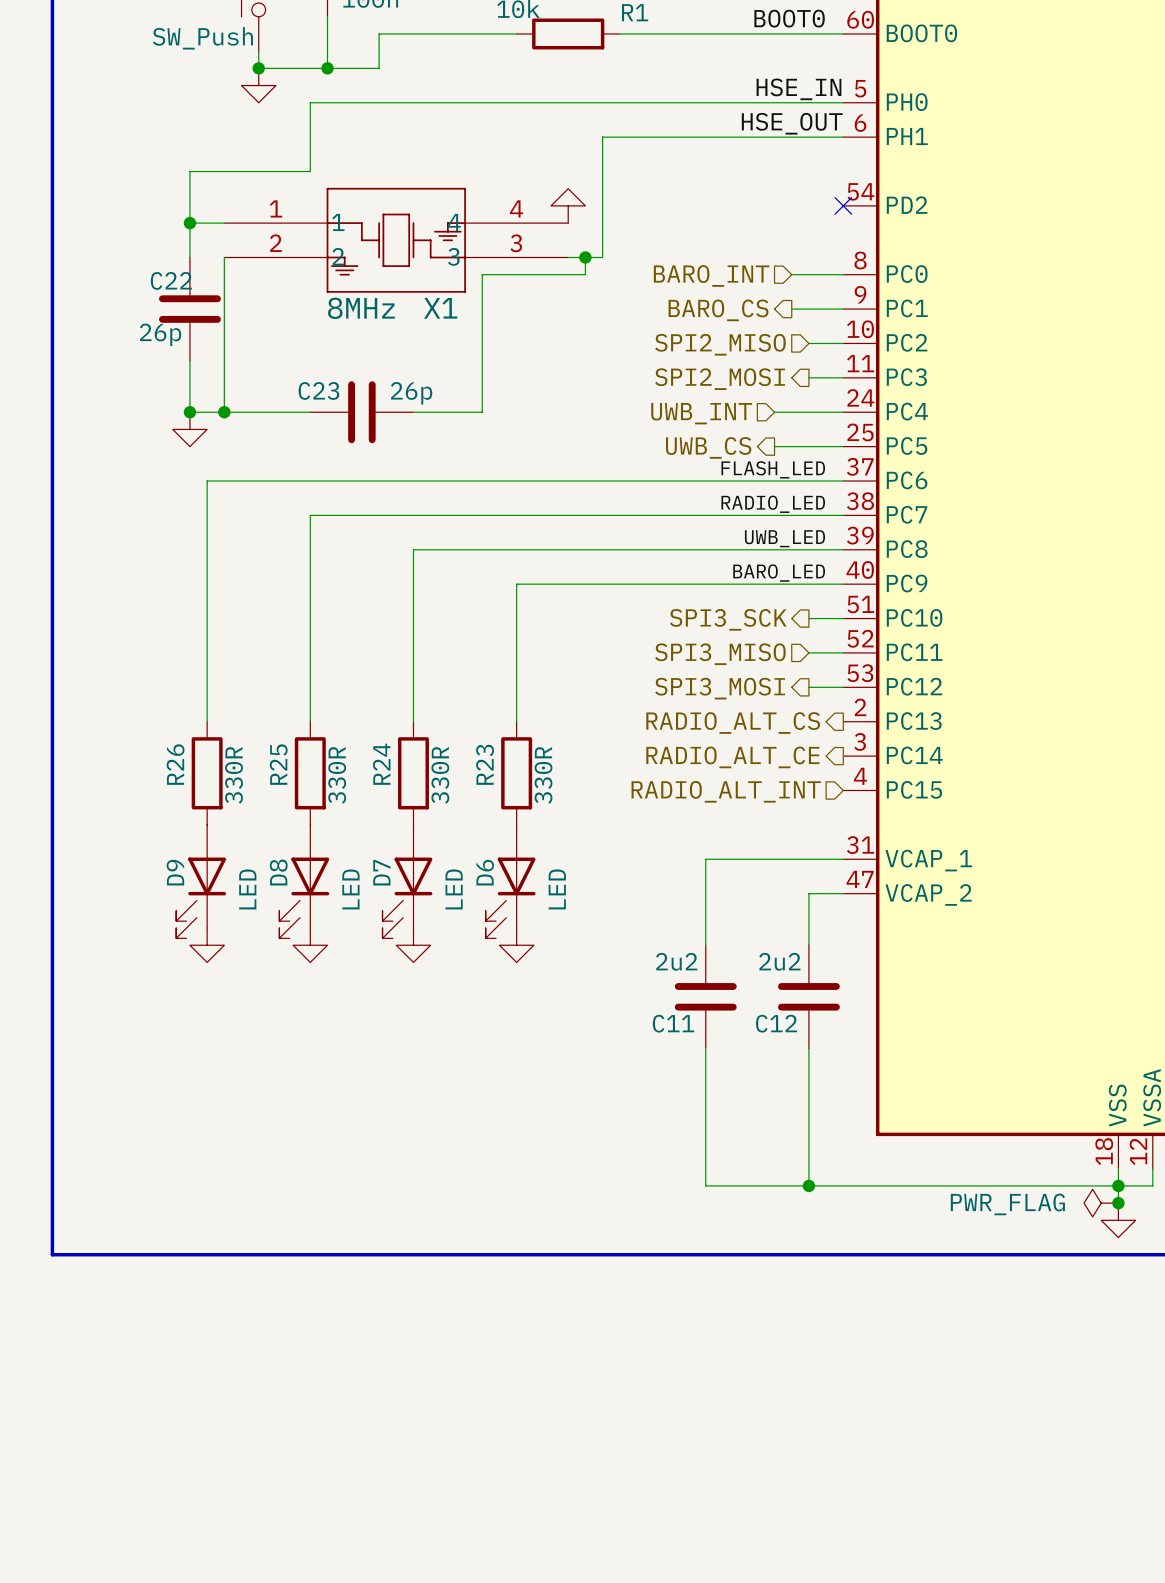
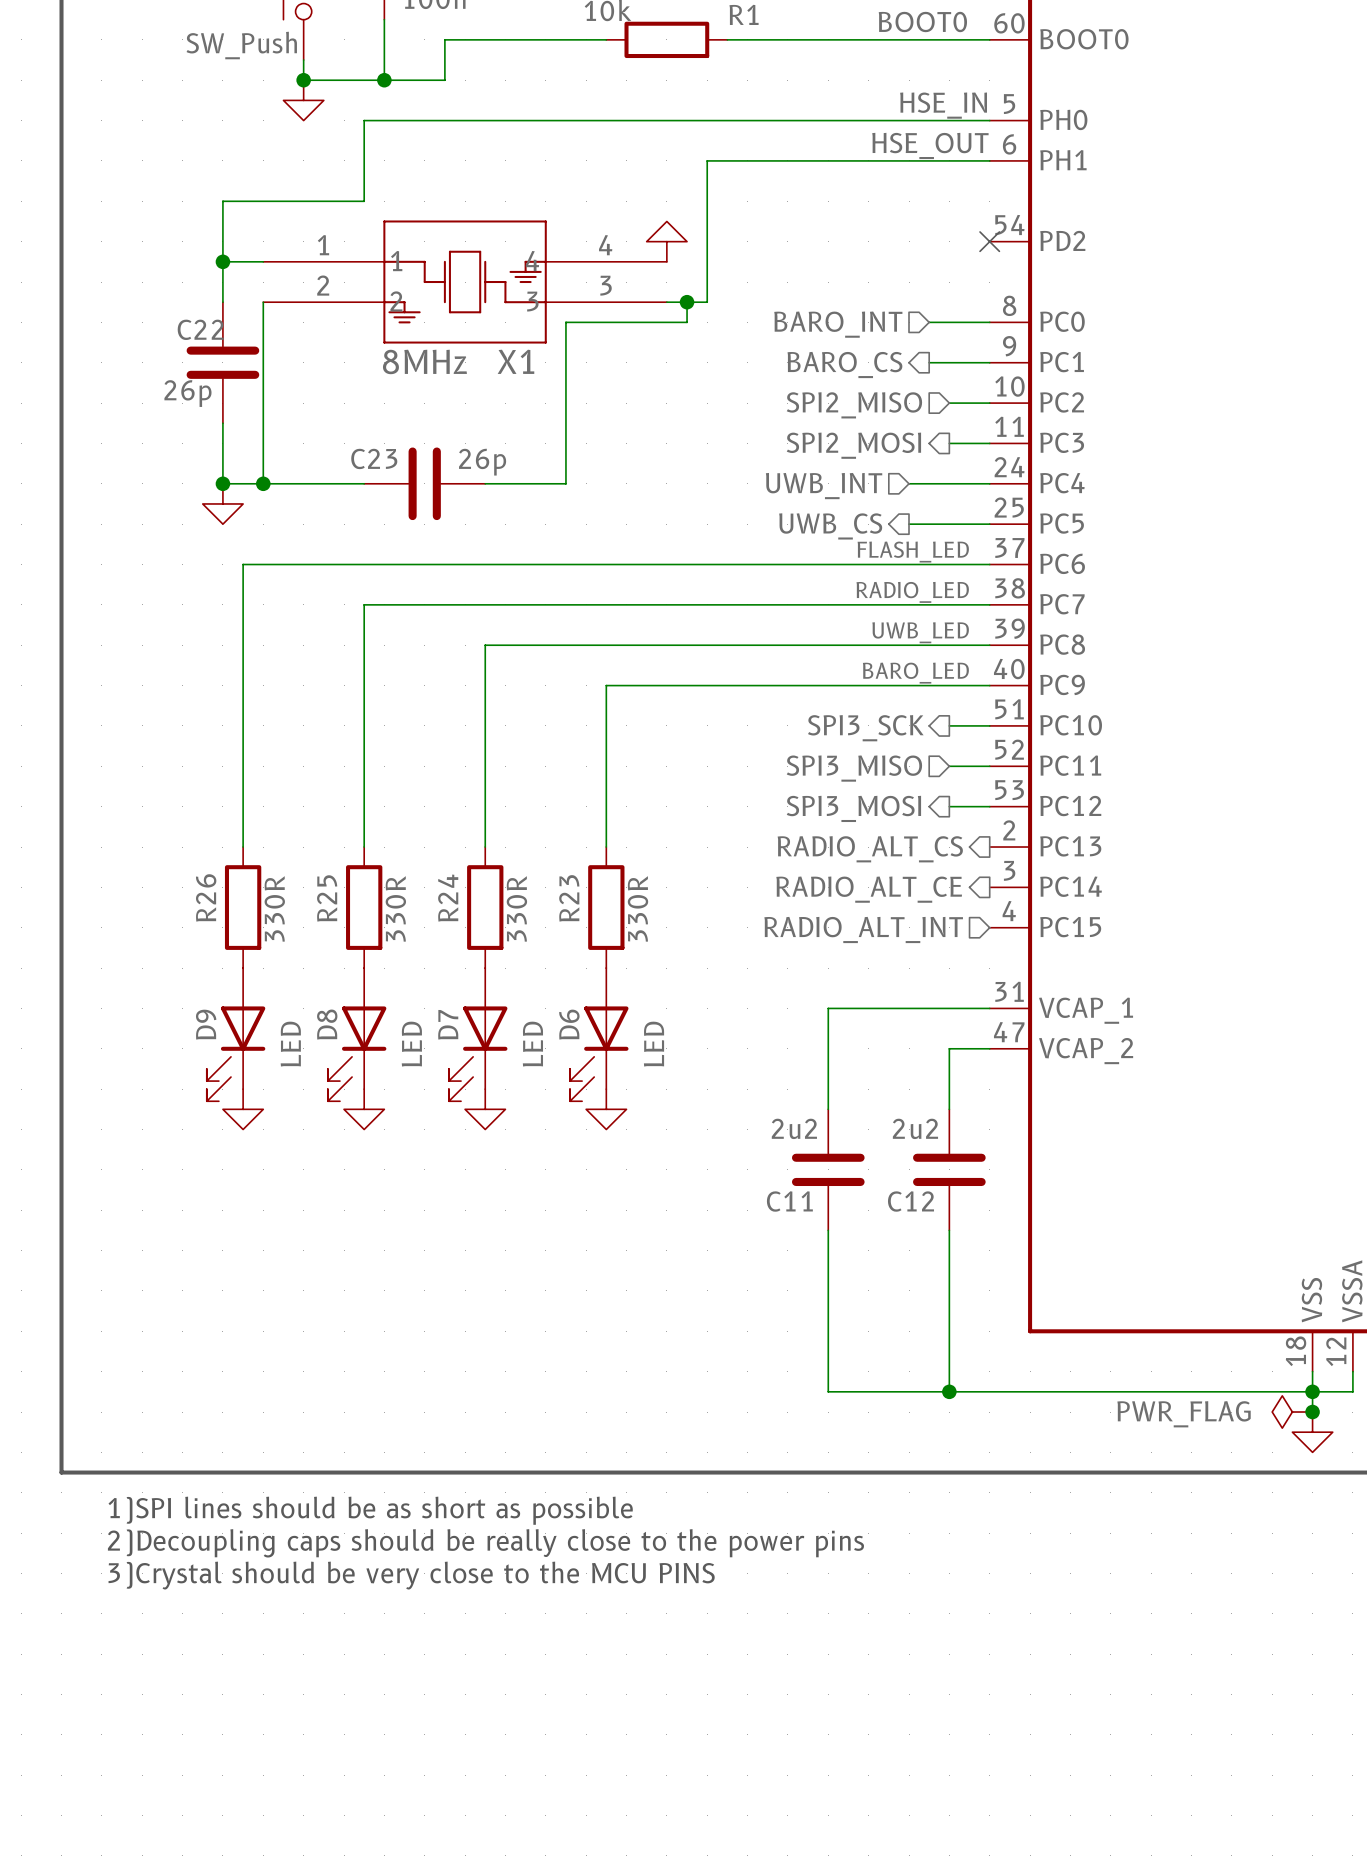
text: none -> 1)SPI lines should be as short as possible (370, 1510)
text: none -> 2)Decoupling caps should be really close to the power pins (485, 1543)
text: none -> 3)Crystal should be very close to the MCU PINS (411, 1575)

